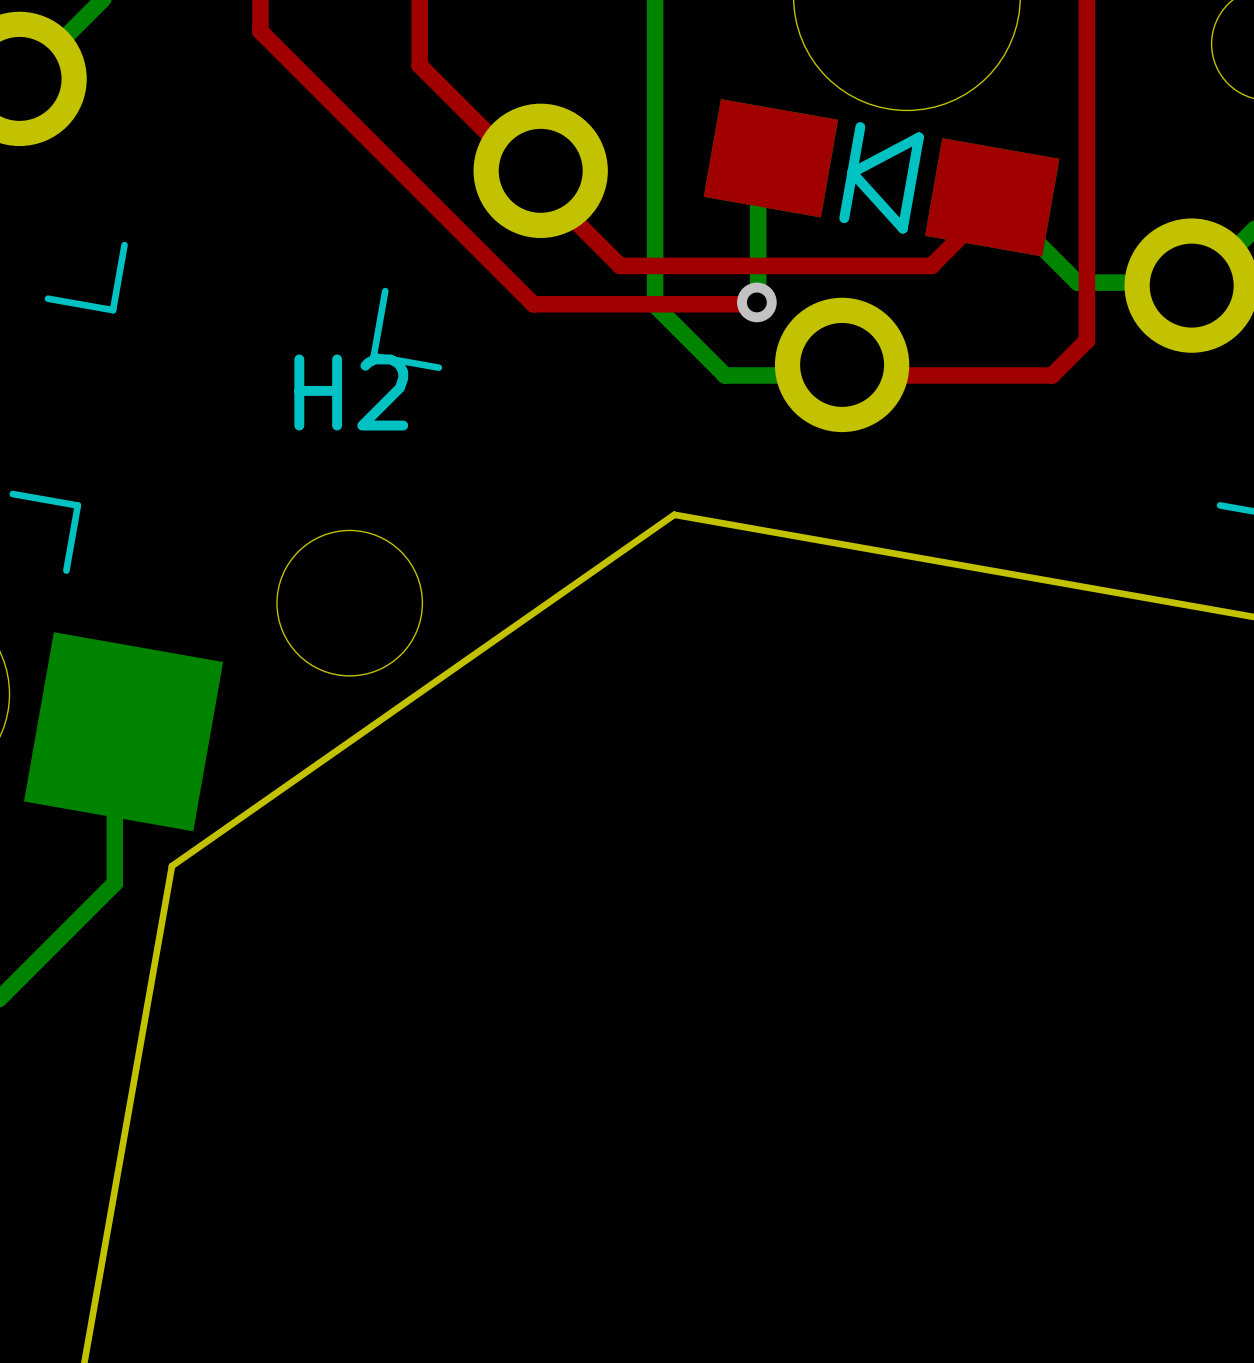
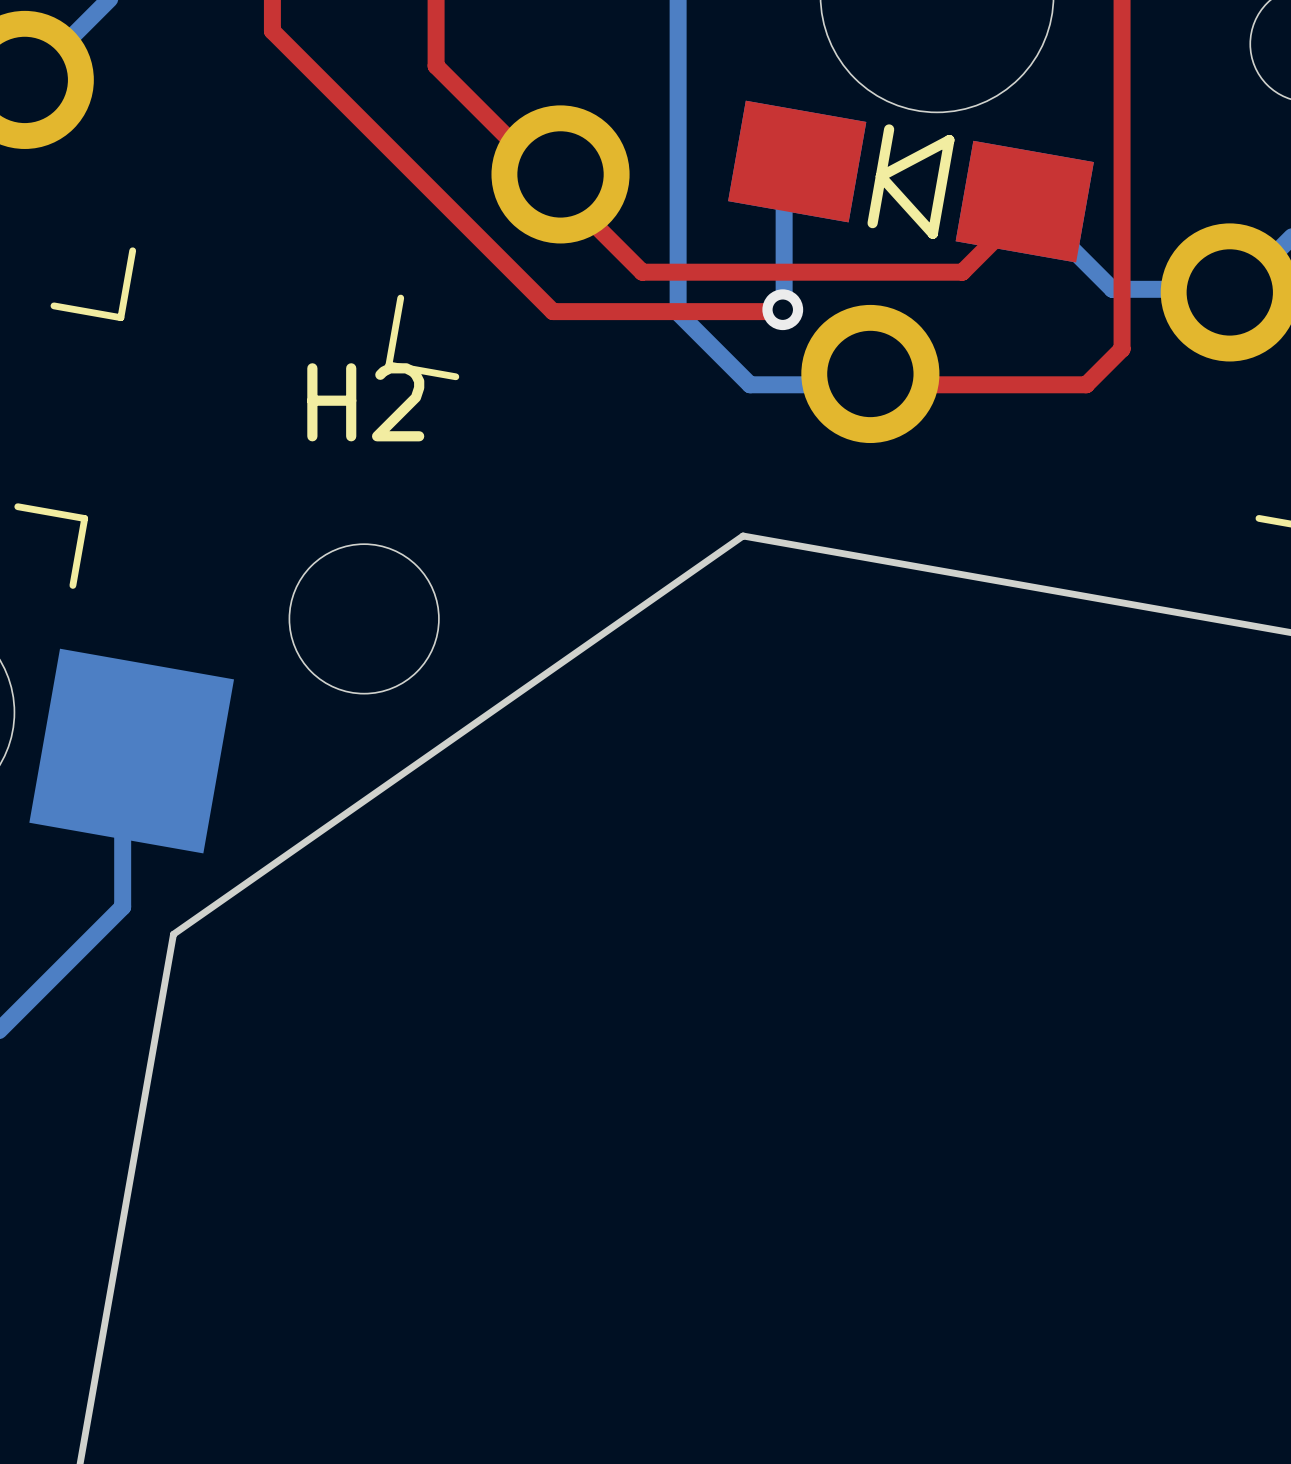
board edge: (718, 522) (674, 514) (171, 866) (164, 909) -> (743, 535) (173, 934)

